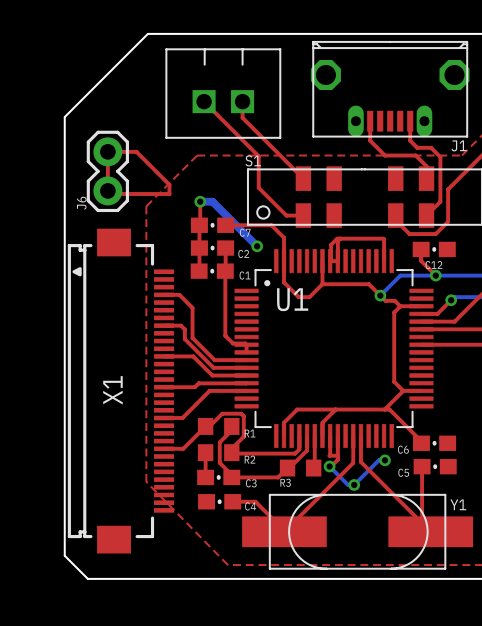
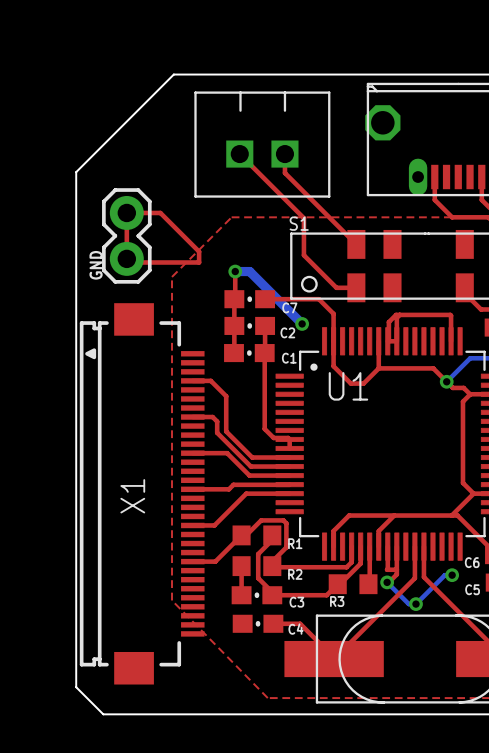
J6 name: J6 (81, 203) -> GND (96, 265)

